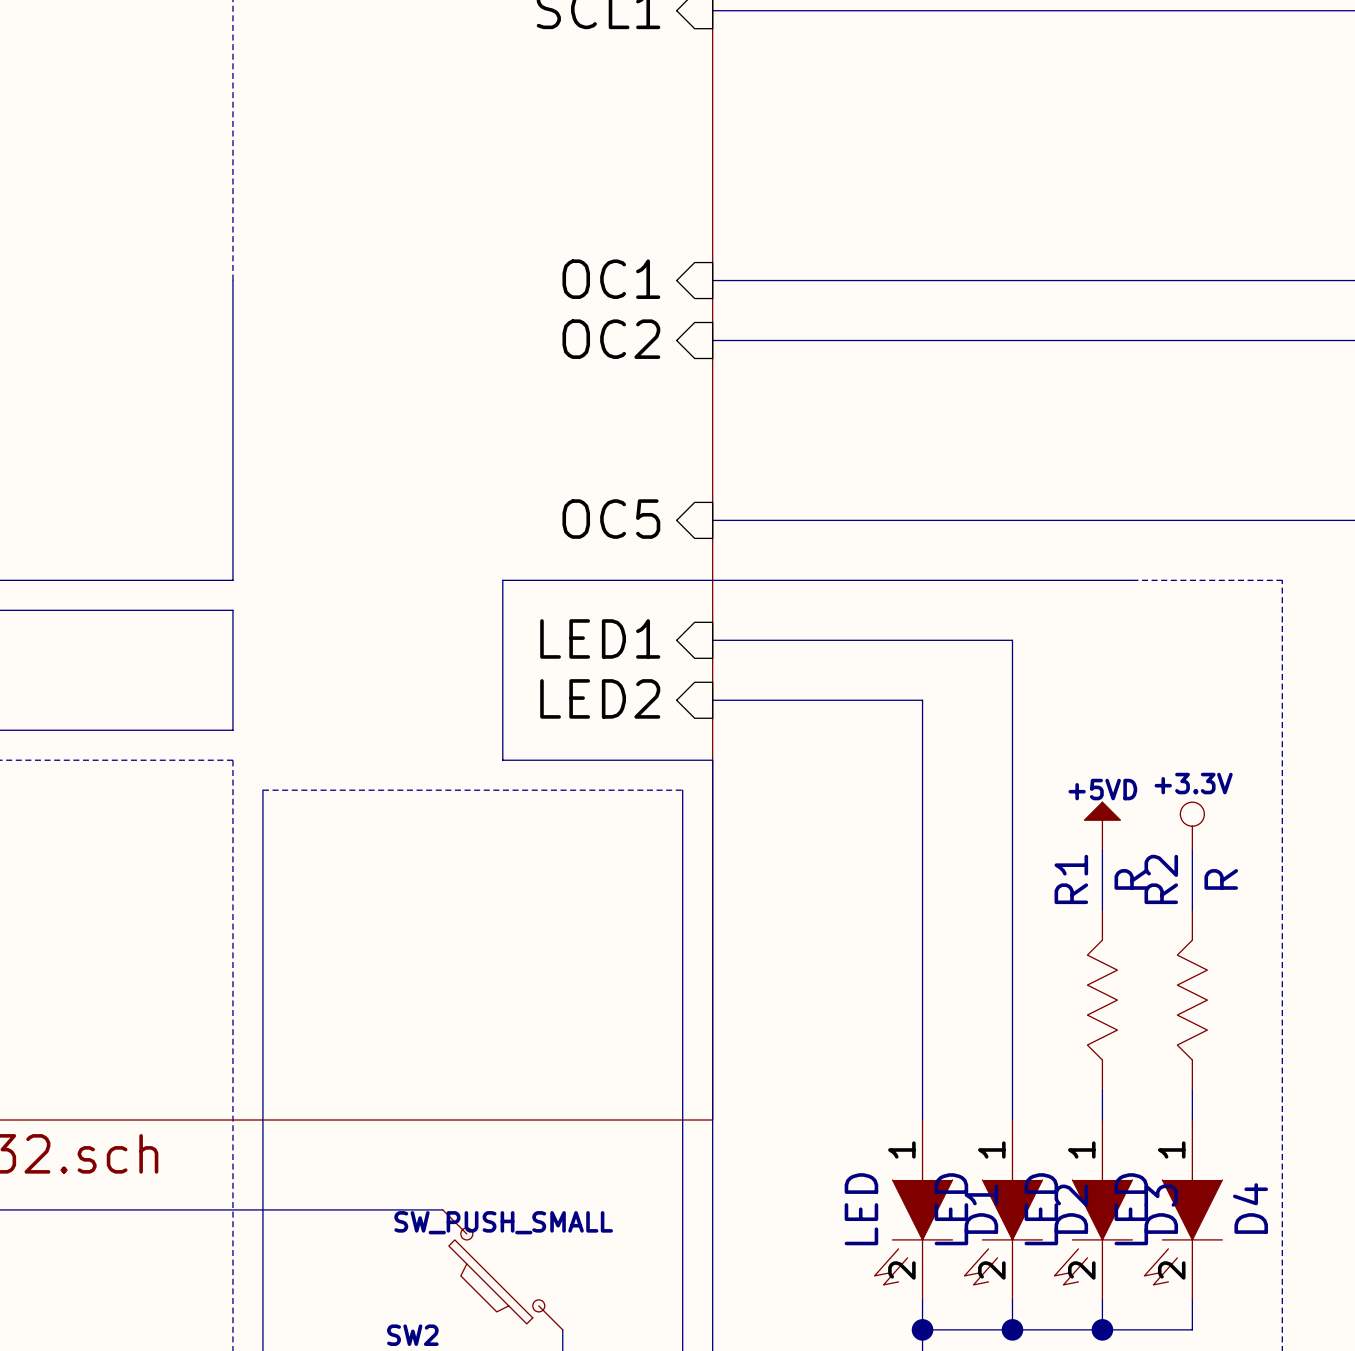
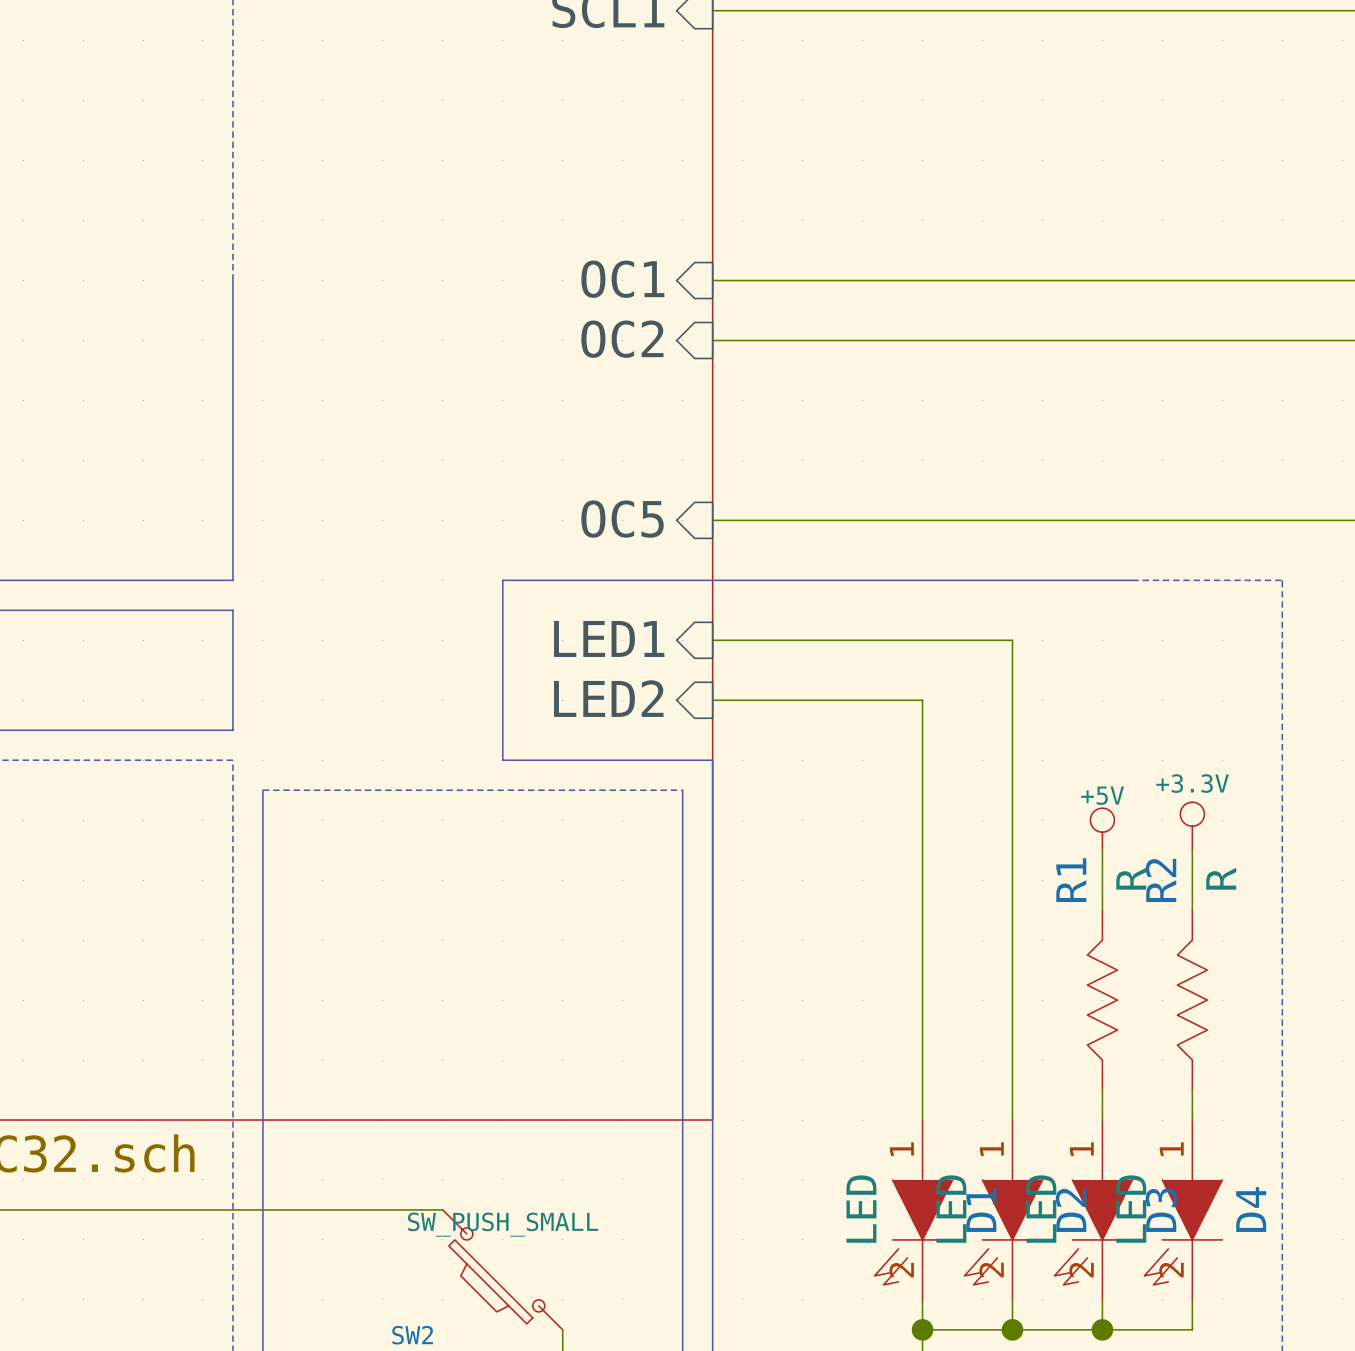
power symbol: +5VD (1102, 826) -> +5V (1102, 829)

